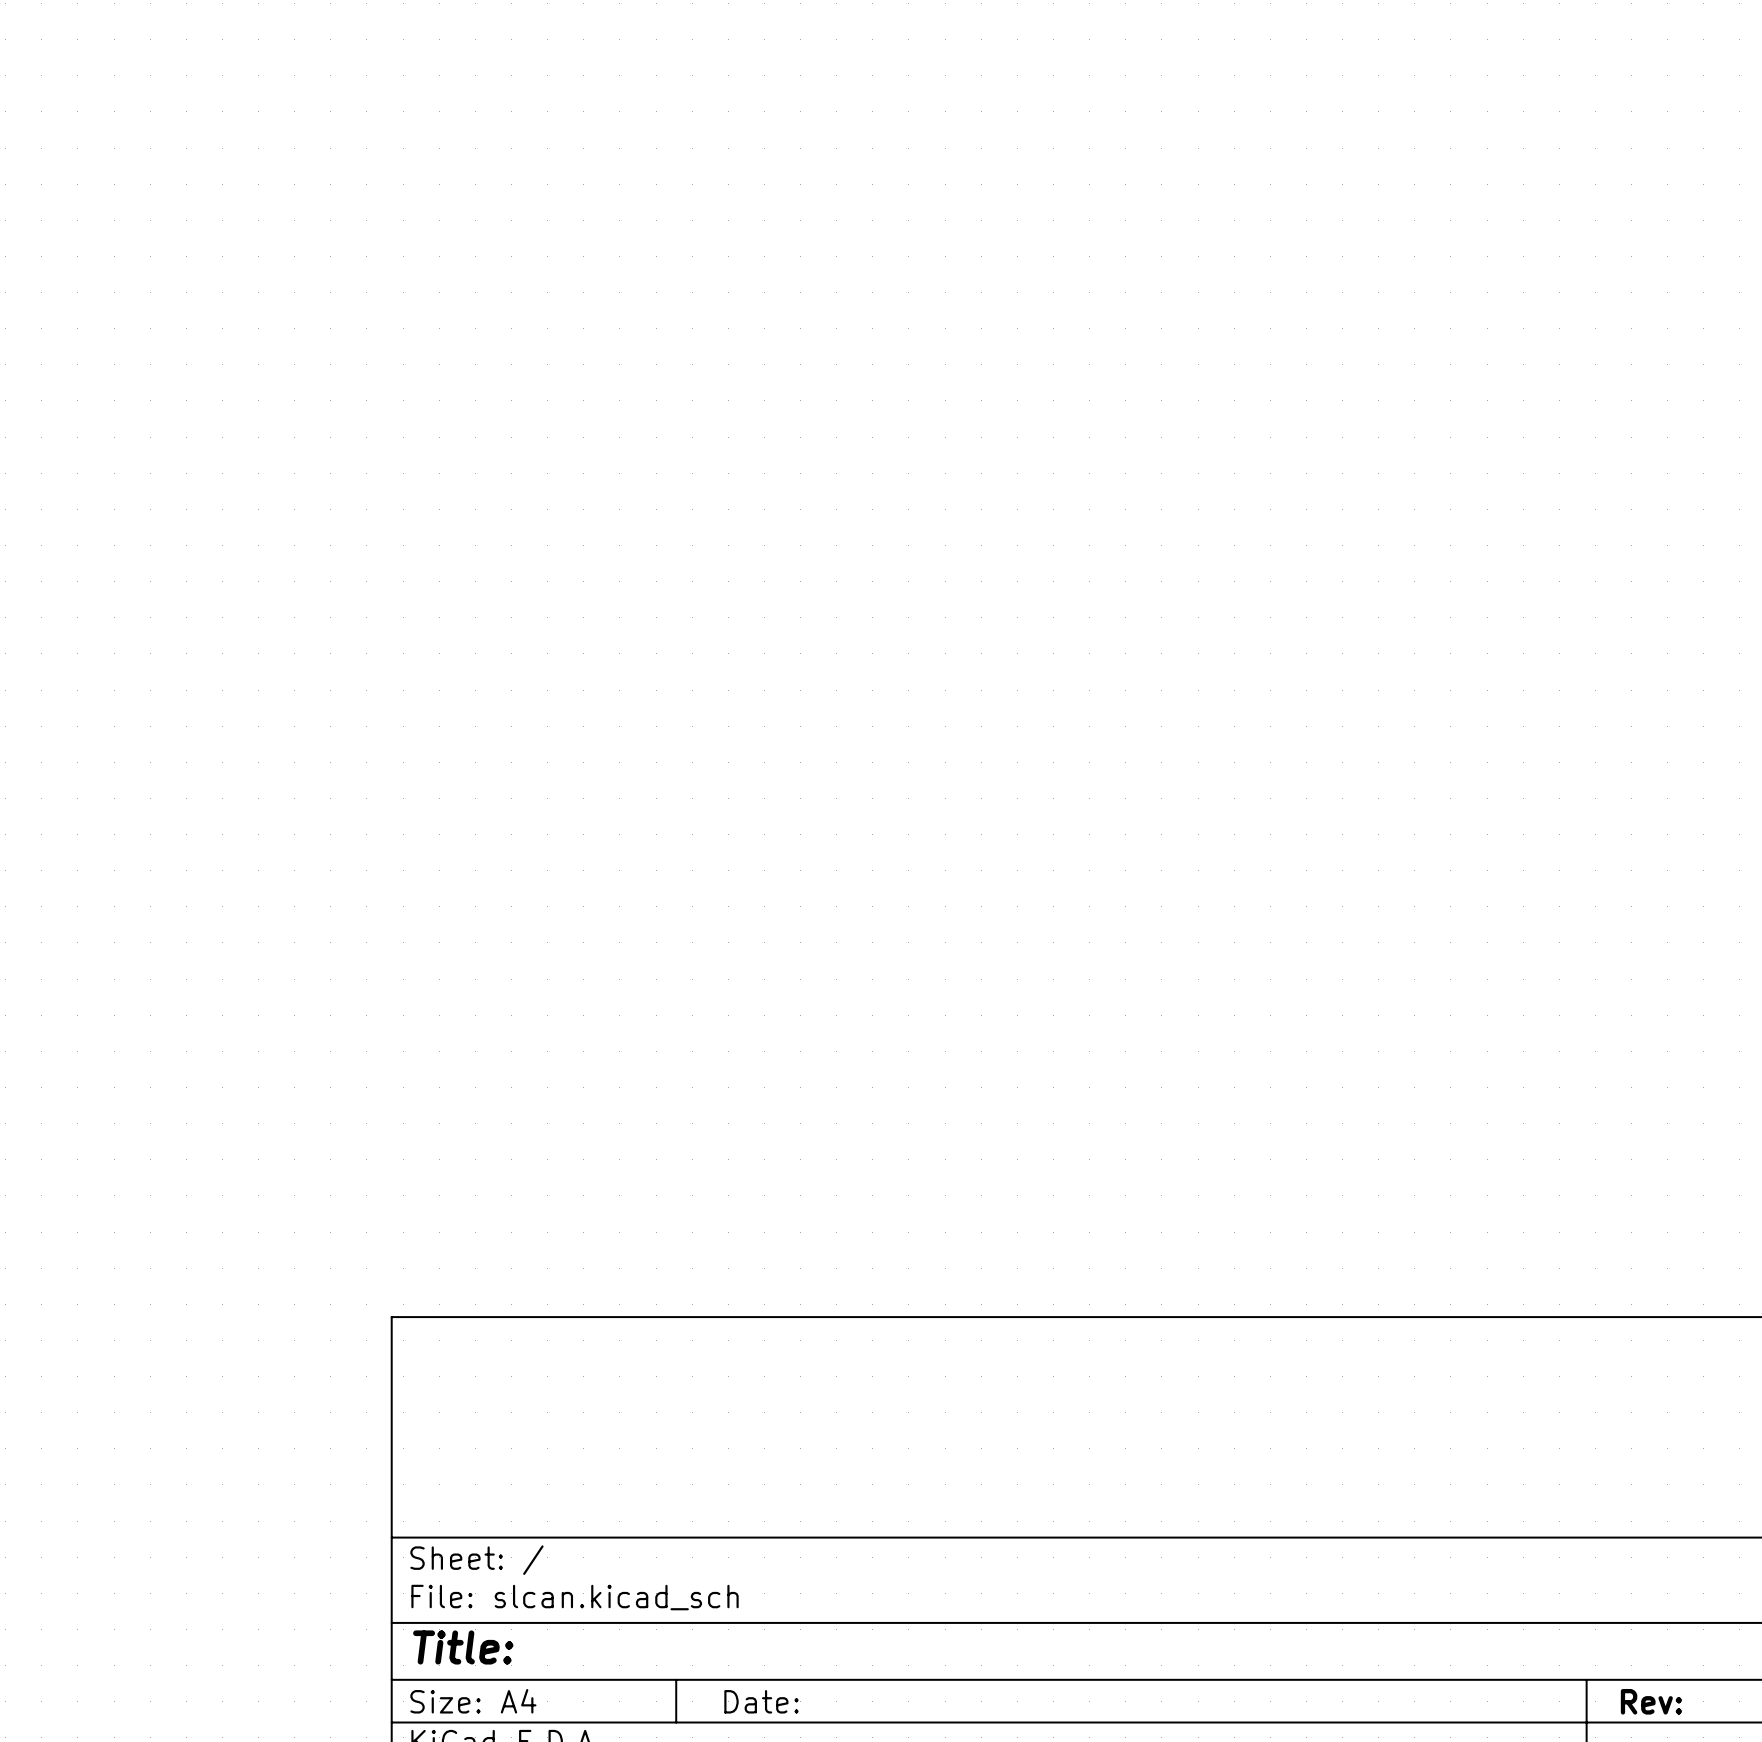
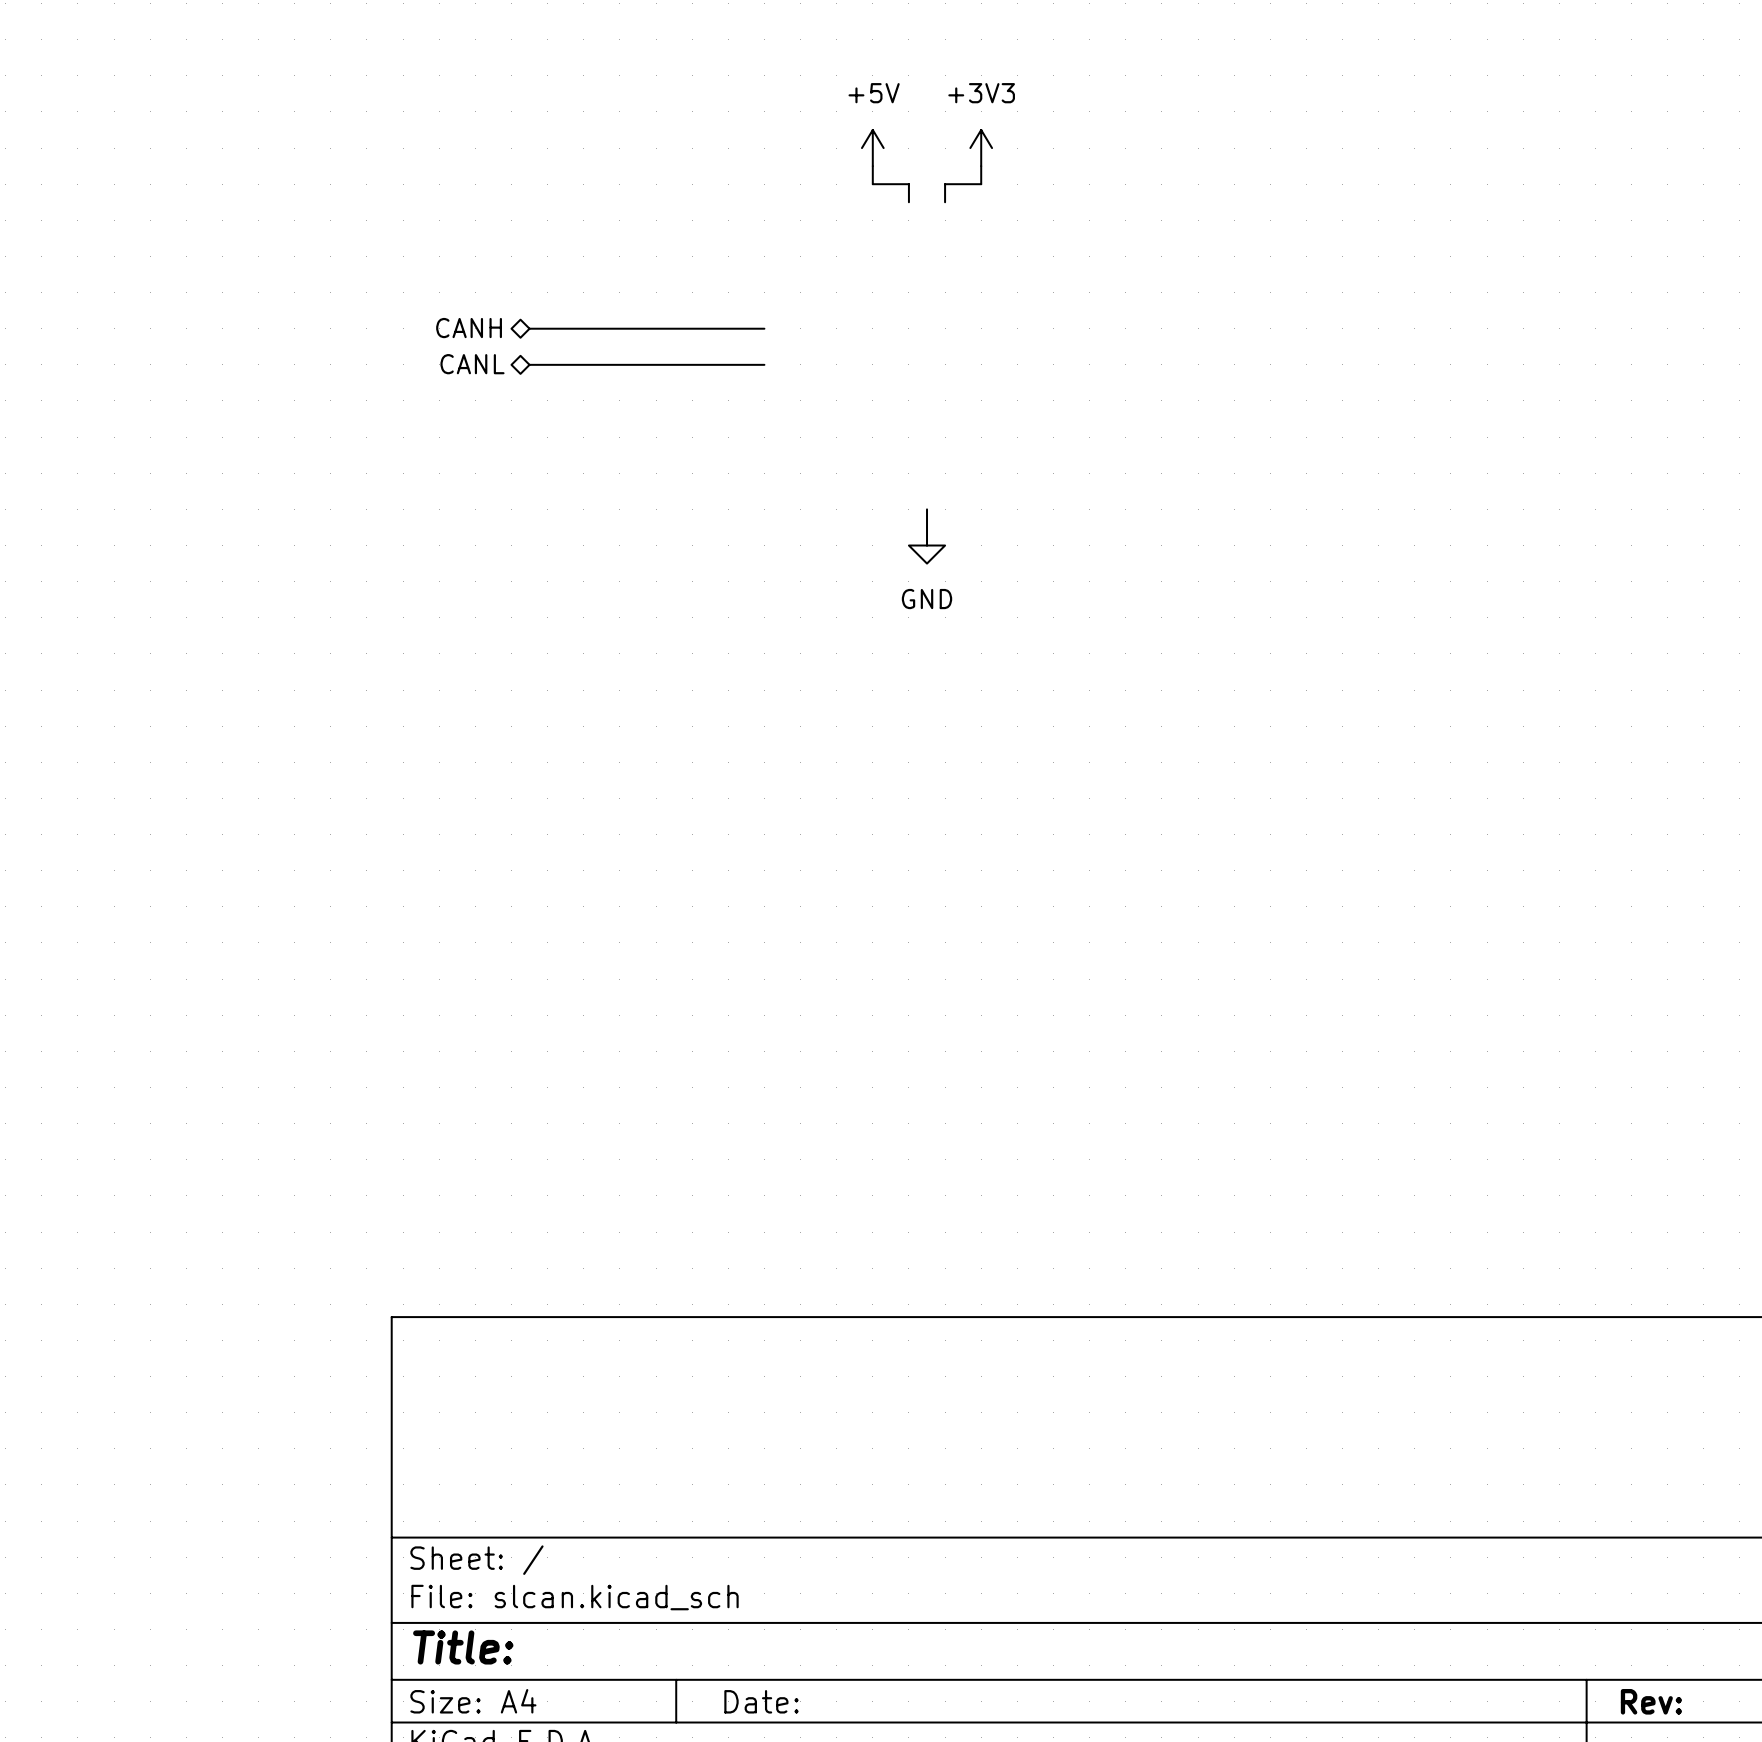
power symbol: none -> +5V (872, 148)
power symbol: none -> +3V3 (981, 148)
wire: none -> (872, 166) (872, 184) (908, 184) (908, 202)
wire: none -> (981, 166) (981, 184) (945, 184) (945, 202)
sheet pin: none -> CANH (469, 328)
wire: none -> (529, 328) (764, 328)
sheet pin: none -> CANL (472, 364)
wire: none -> (529, 364) (764, 364)
wire: none -> (927, 509) (927, 527)
power symbol: none -> GND (927, 545)

